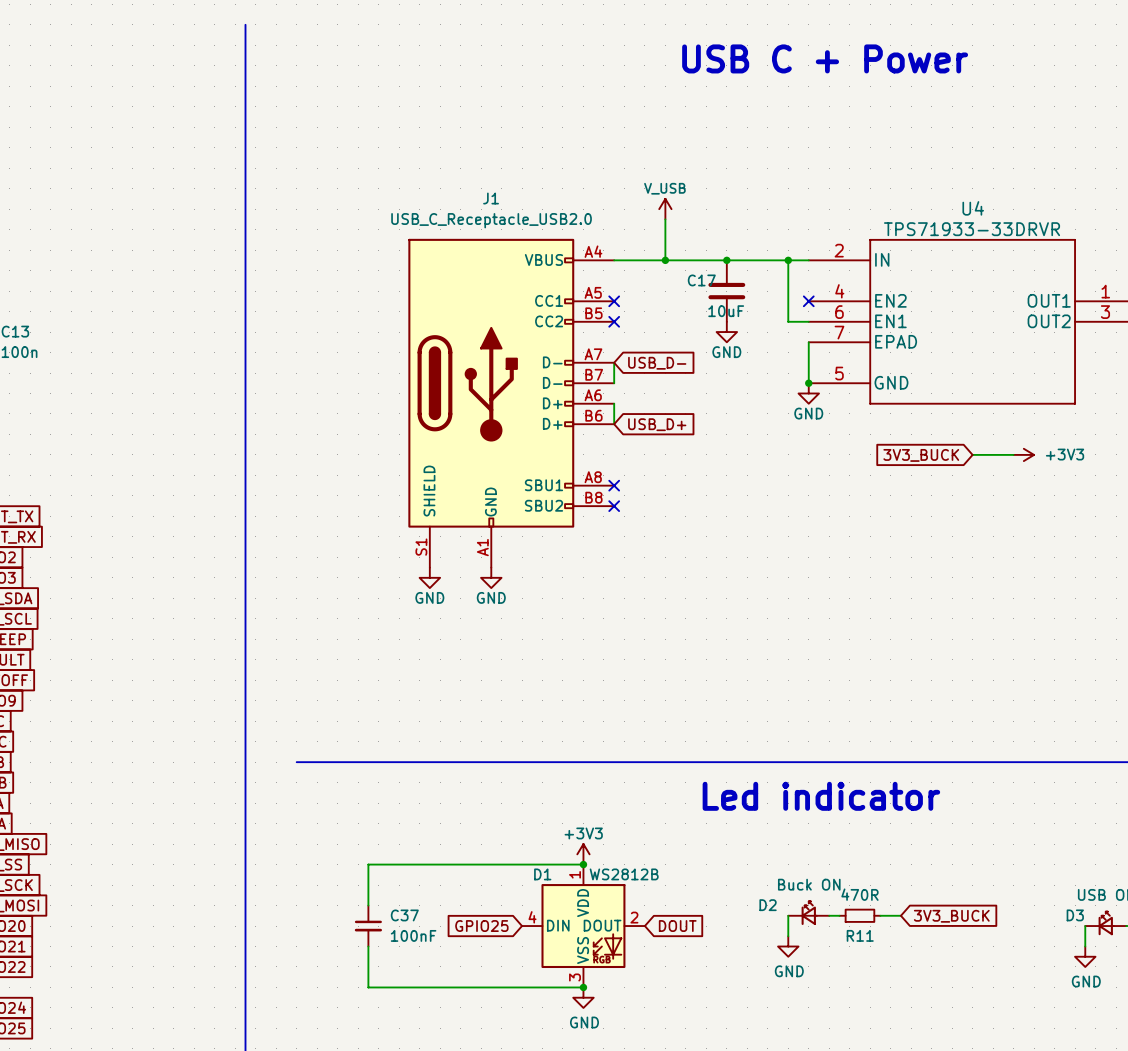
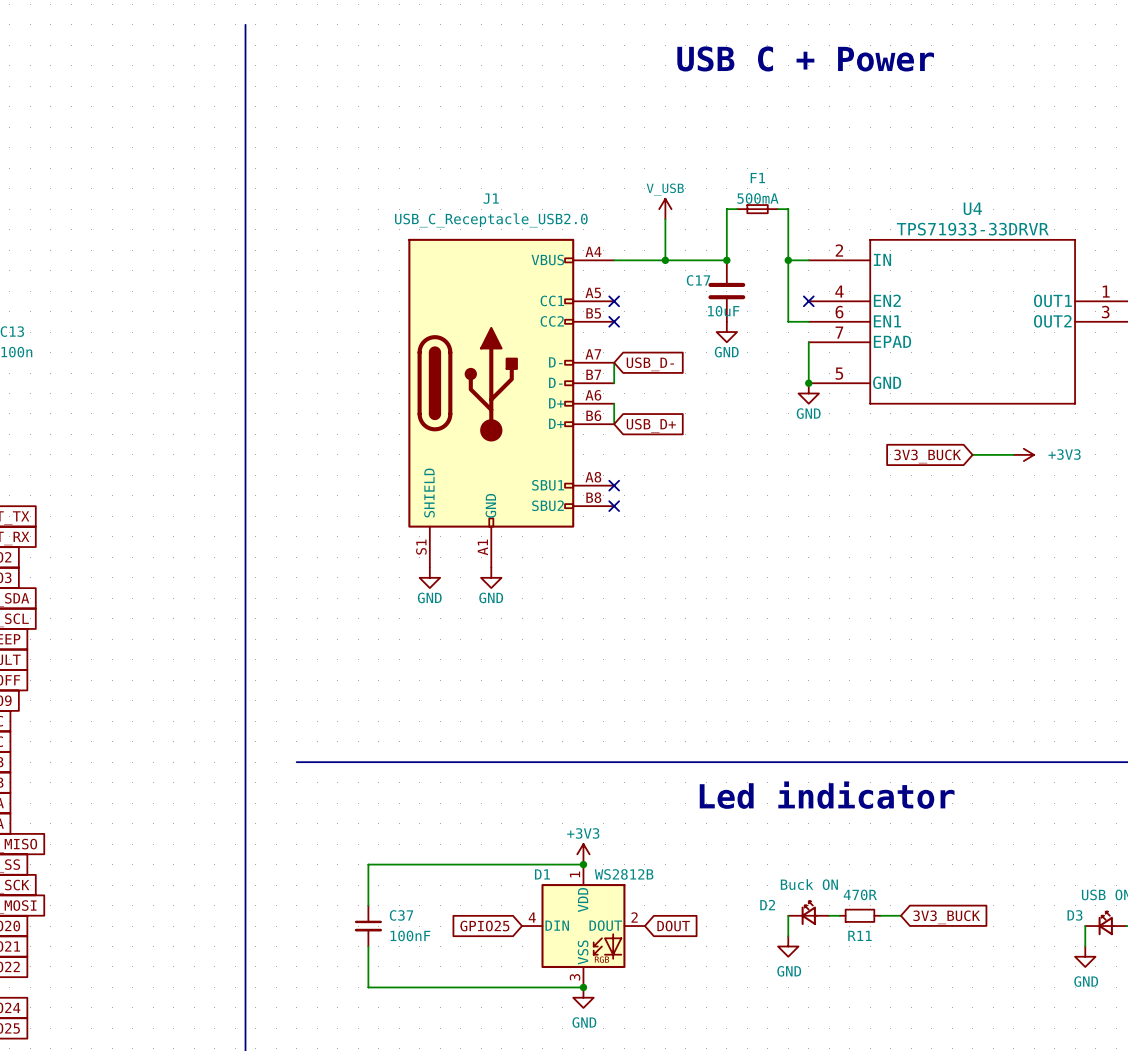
F1: none -> 500mA (757, 209)
wire: none -> (778, 209) (788, 209) (788, 260)
wire: (726, 260) (788, 260) -> (726, 260) (726, 209) (737, 209)

